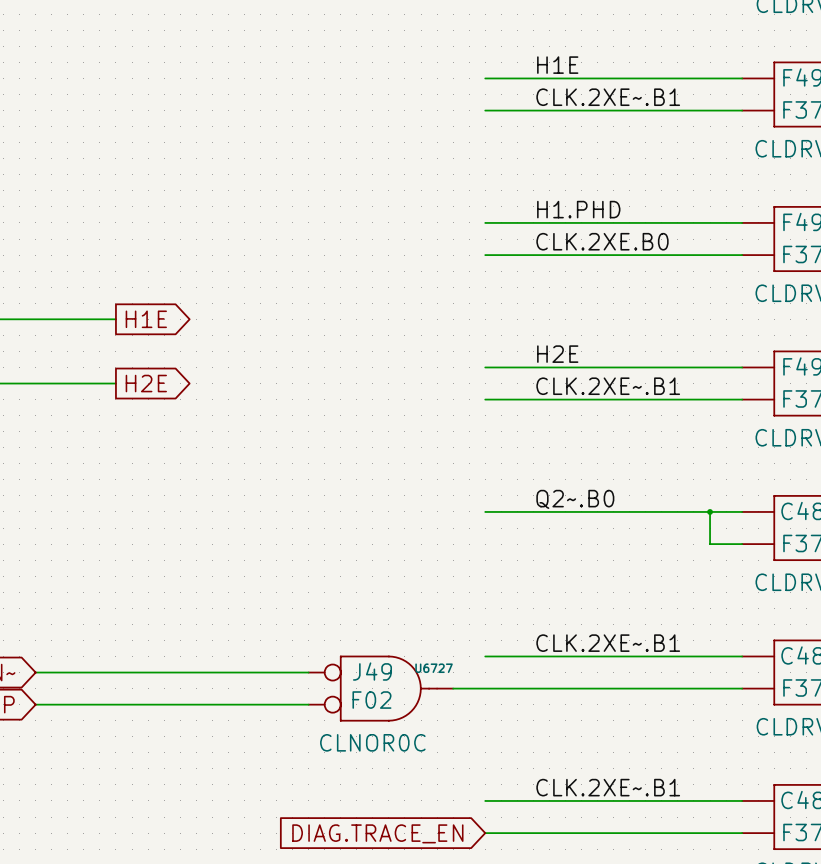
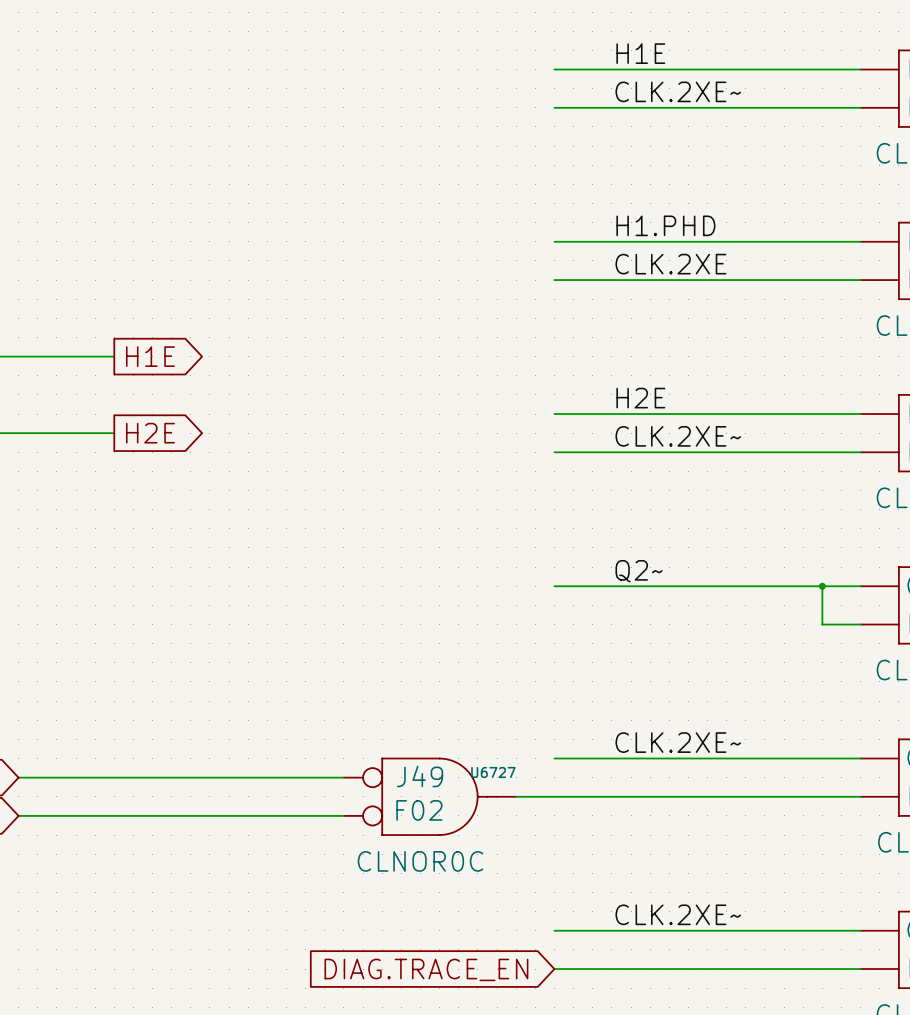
label: CLK.2XE~.B1 (608, 97) -> CLK.2XE~ (678, 91)
label: CLK.2XE.B0 (602, 241) -> CLK.2XE (670, 264)
label: CLK.2XE~.B1 (608, 386) -> CLK.2XE~ (678, 436)
label: Q2~.B0 (575, 499) -> Q2~ (639, 571)
label: CLK.2XE~.B1 (608, 643) -> CLK.2XE~ (678, 742)
label: CLK.2XE~.B1 (608, 787) -> CLK.2XE~ (678, 914)

